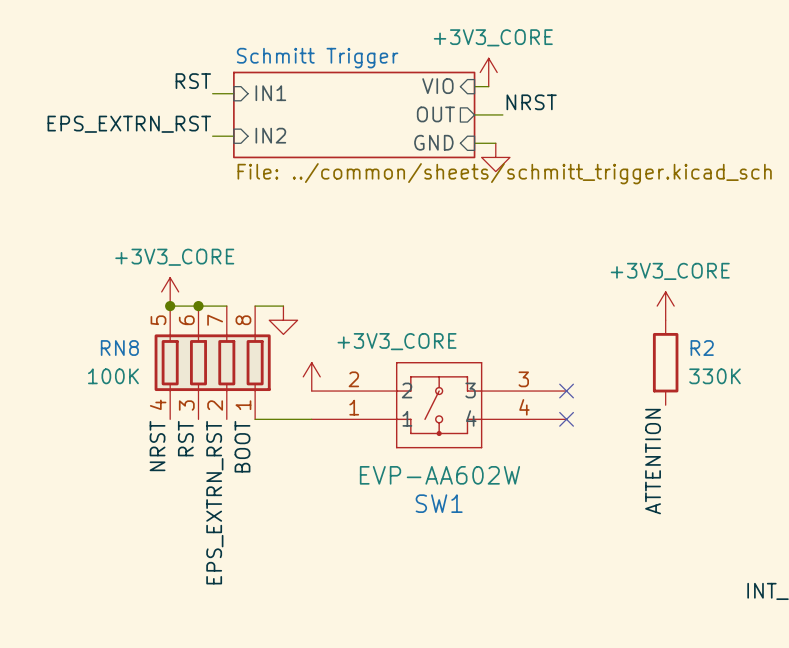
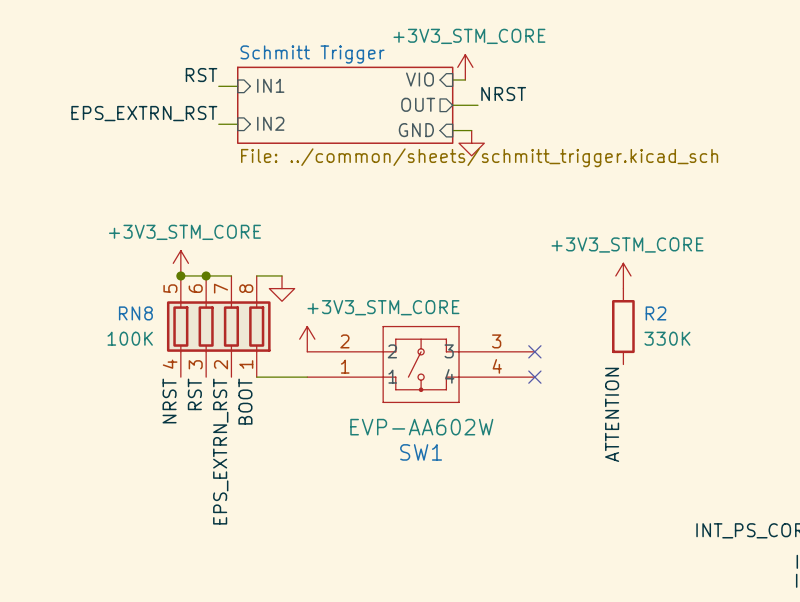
power symbol: +3V3_CORE (488, 72) -> +3V3_STM_CORE (465, 67)
power symbol: +3V3_CORE (170, 291) -> +3V3_STM_CORE (180, 263)
power symbol: +3V3_CORE (665, 306) -> +3V3_STM_CORE (623, 275)
power symbol: +3V3_CORE (311, 376) -> +3V3_STM_CORE (307, 339)

